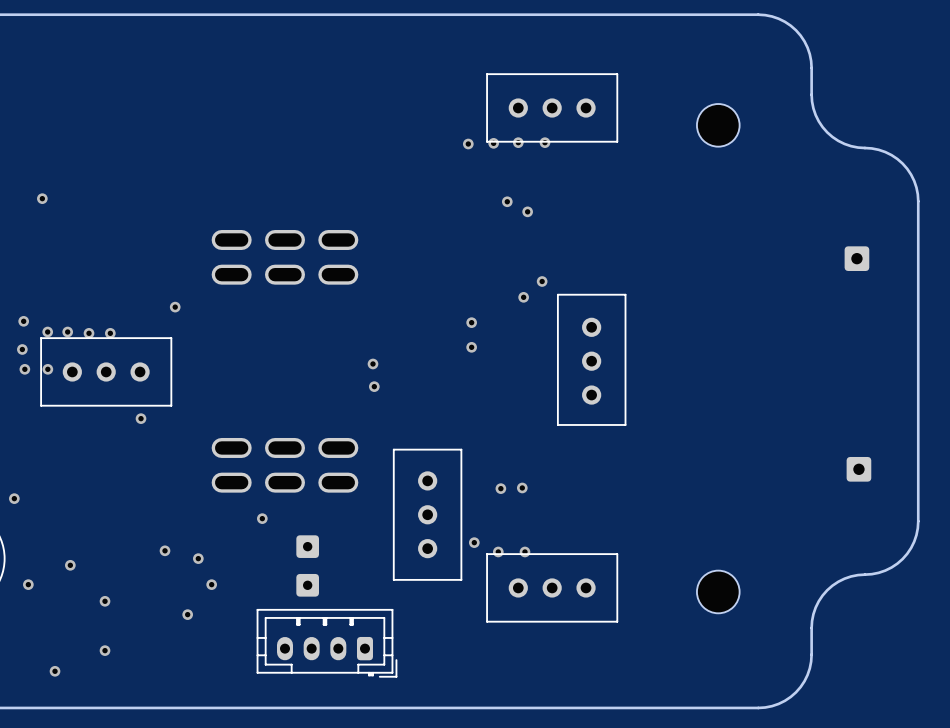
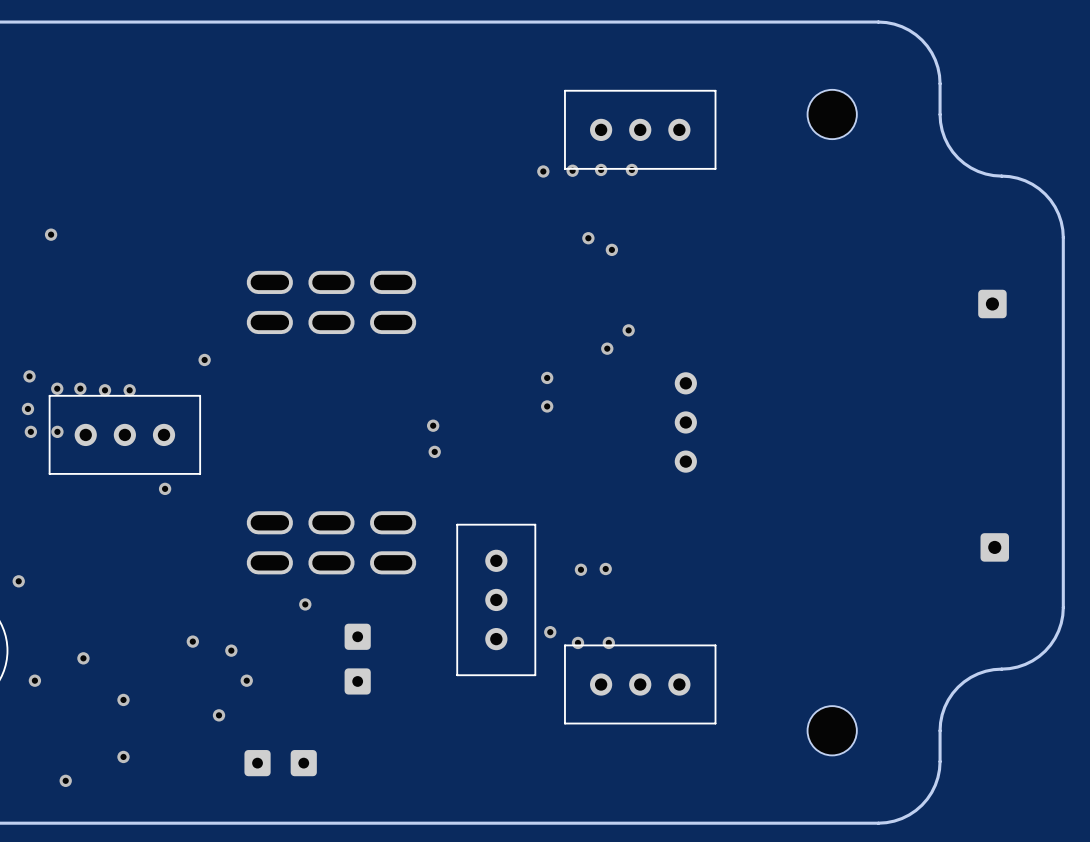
part position: (718, 125) -> (832, 114)
part side: bottom (591, 359) -> top (685, 422)
part position: (718, 591) -> (832, 730)
part: (326, 643) -> none
part: none -> (257, 763)
part: none -> (303, 763)

